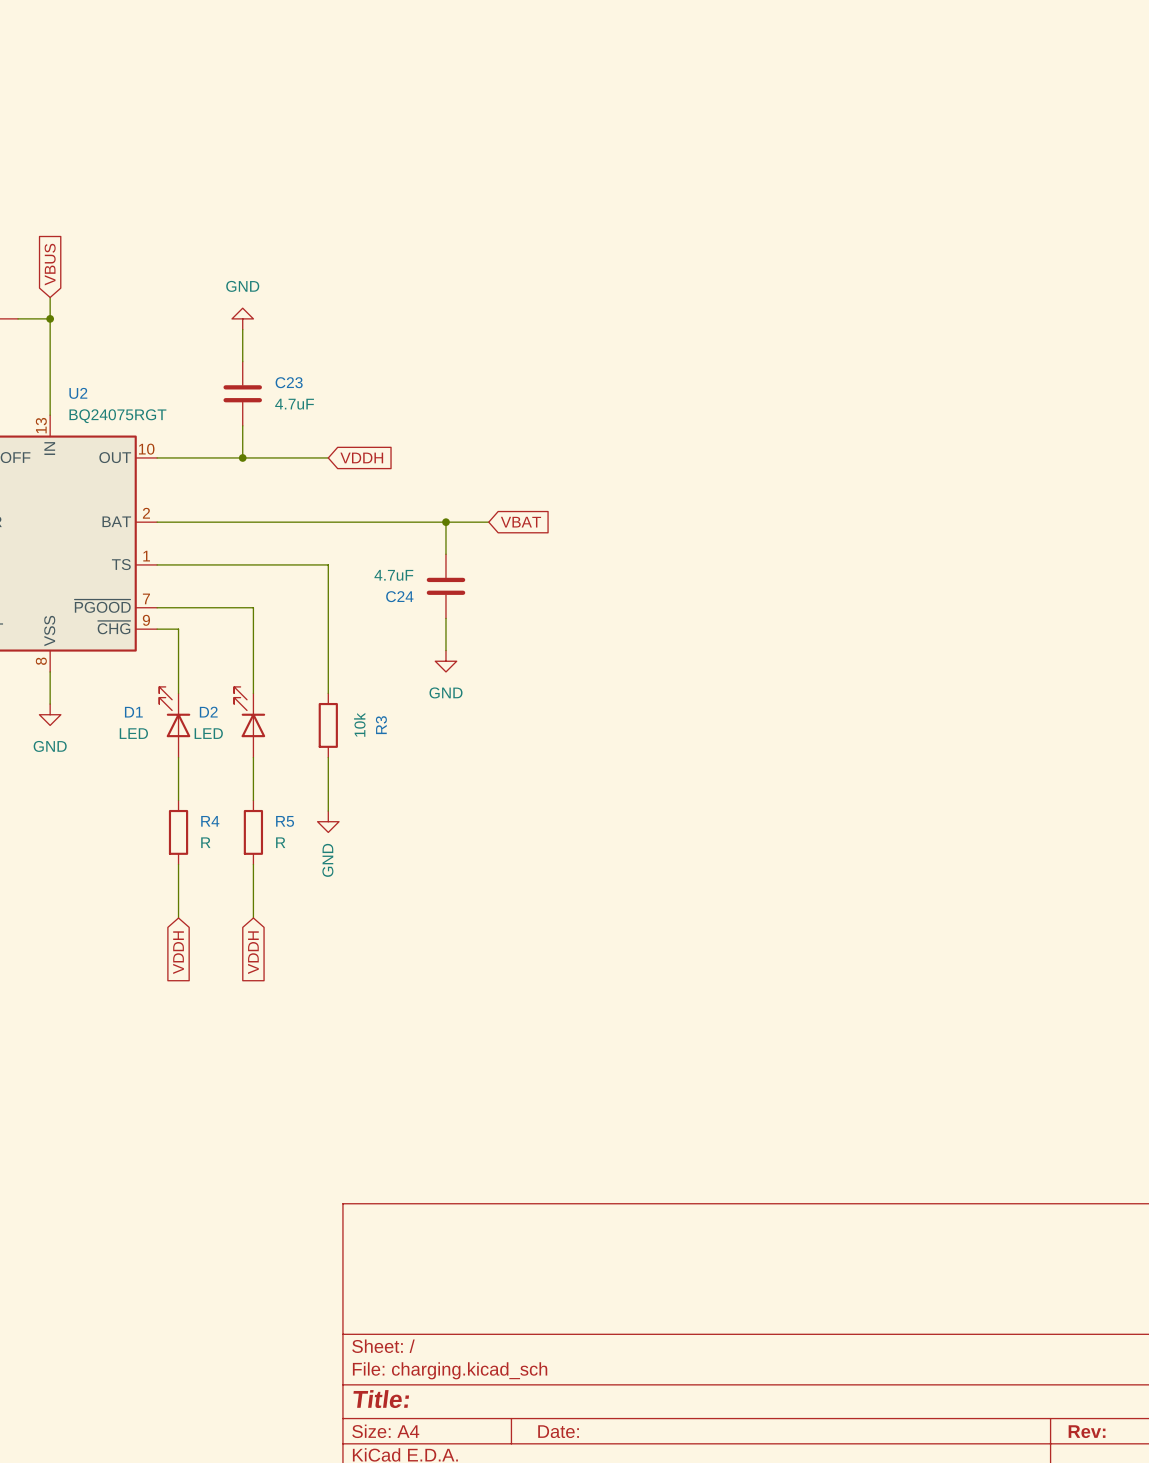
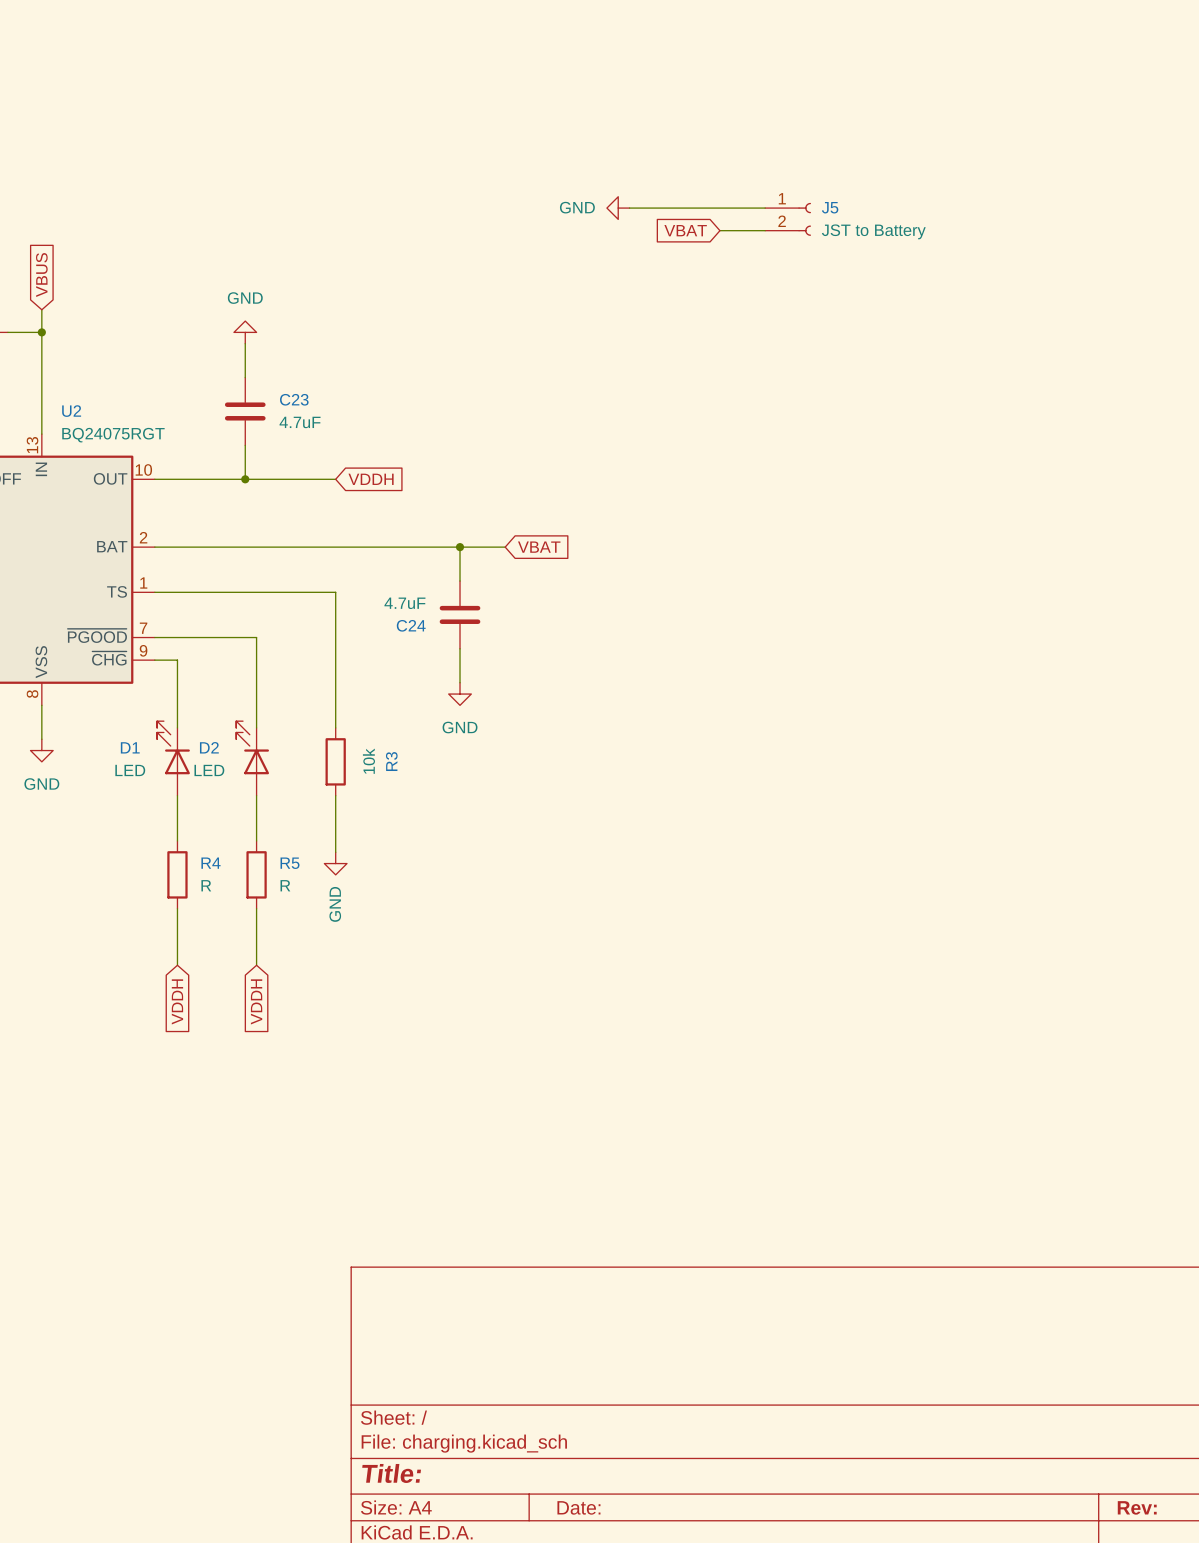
power symbol: none -> GND (618, 208)
wire: none -> (629, 208) (765, 208)
J5: none -> JST to Battery (788, 219)
global label: none -> VBAT (685, 230)
wire: none -> (719, 230) (765, 230)

